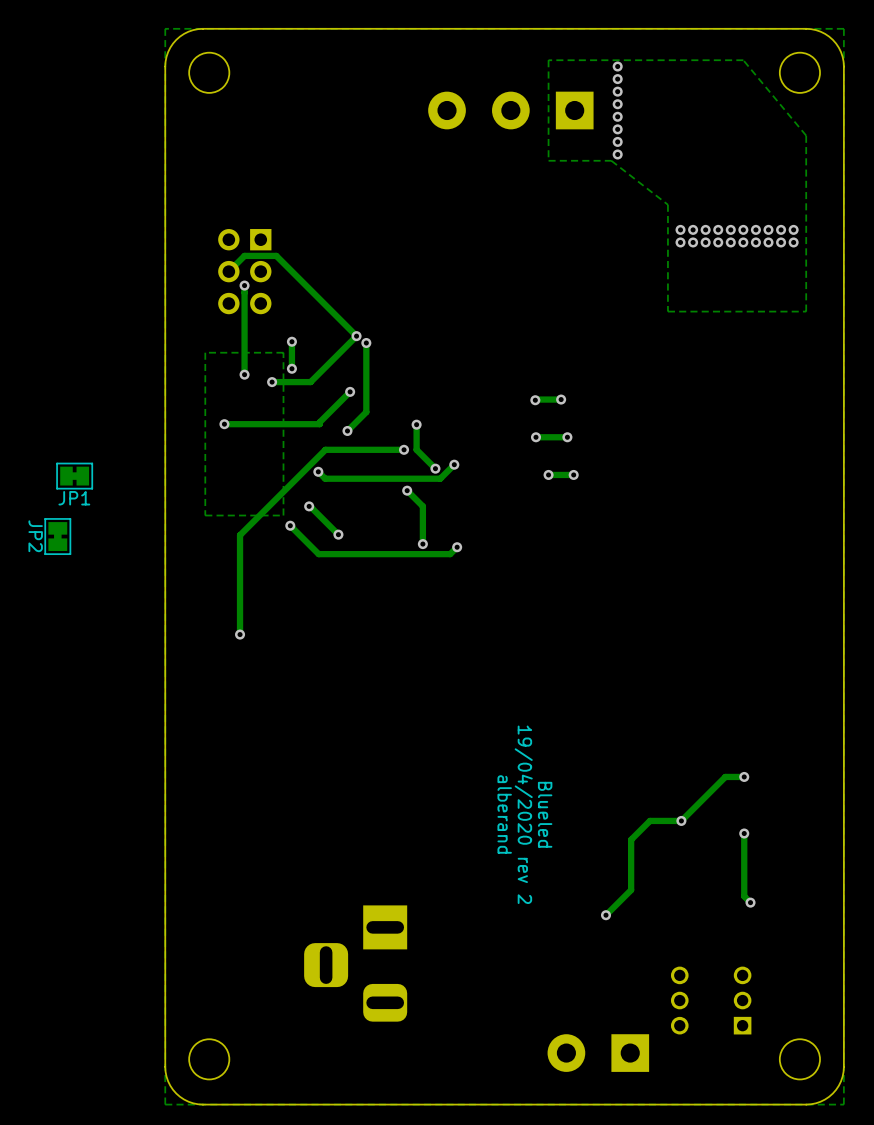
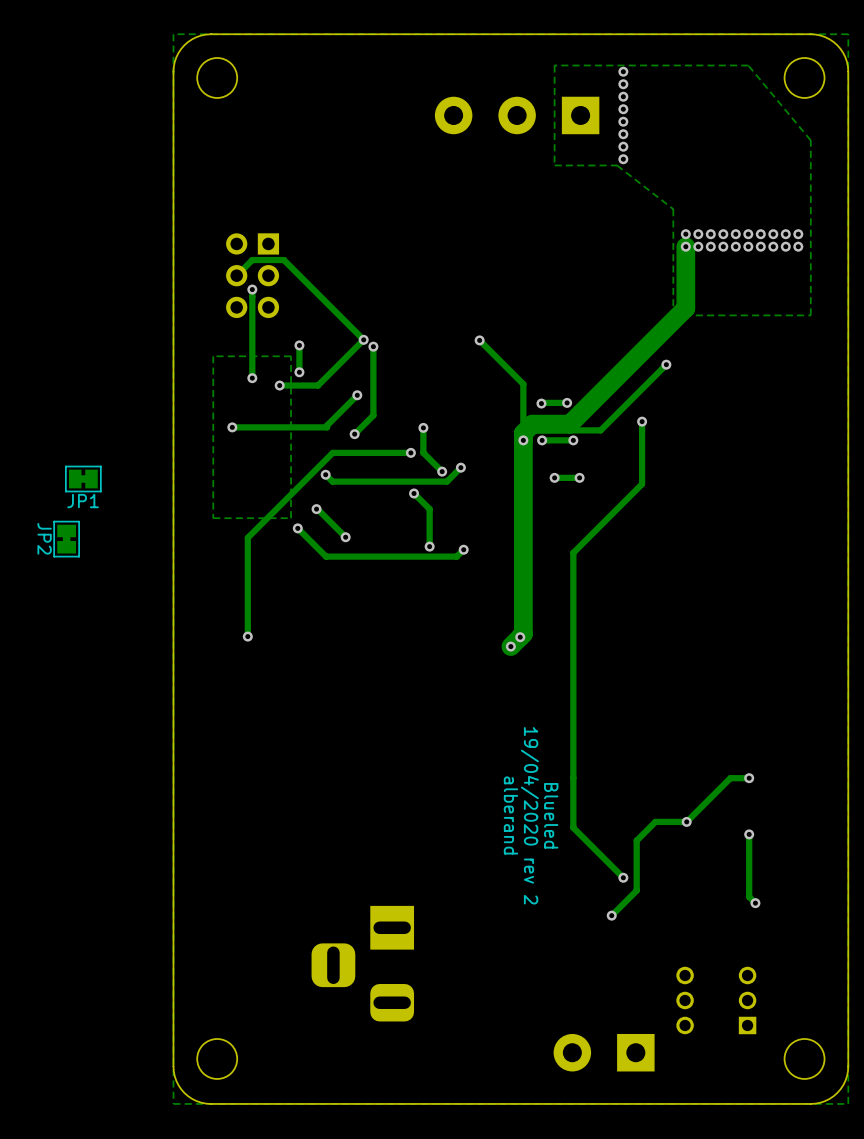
track: none -> (685, 246) (685, 308) (569, 424) (532, 424) (523, 433) (523, 634) (510, 646)
track: none -> (479, 340) (523, 384) (523, 440) (533, 430) (600, 430) (666, 364)
via: none -> (479, 340)
via: none -> (666, 364)
track: none -> (642, 421) (642, 484) (573, 552) (573, 827) (623, 877)
via: none -> (642, 421)
via: none -> (523, 440)
via: none -> (520, 637)
via: none -> (510, 646)
via: none -> (623, 877)

